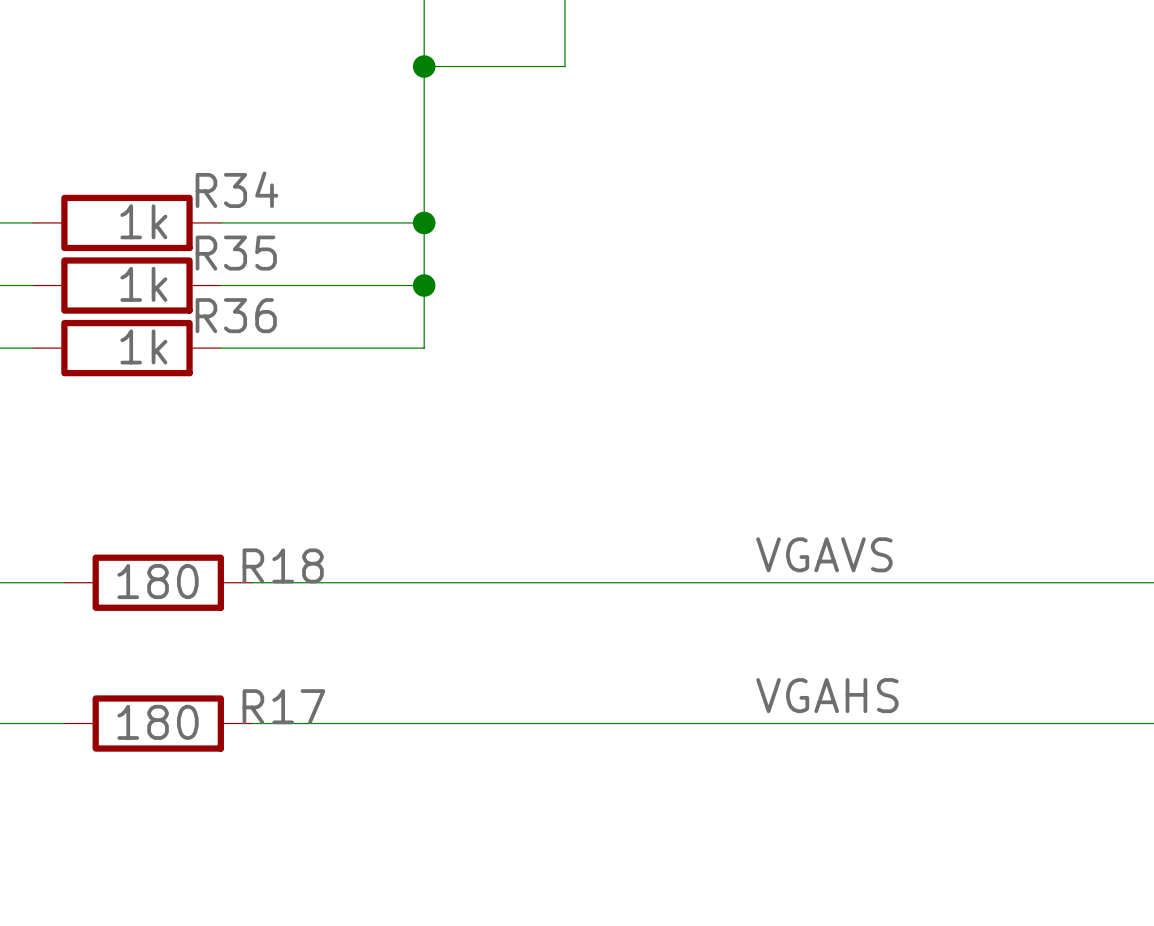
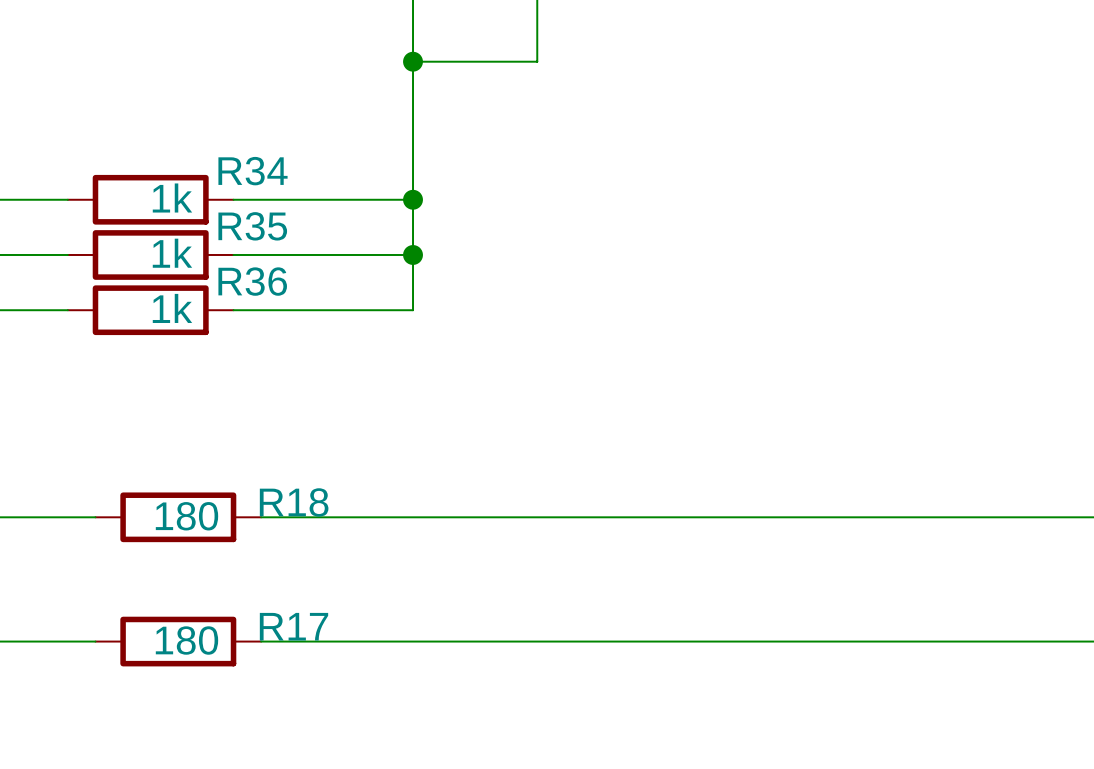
label: VGAVS (824, 554) -> none
label: VGAHS (827, 695) -> none

